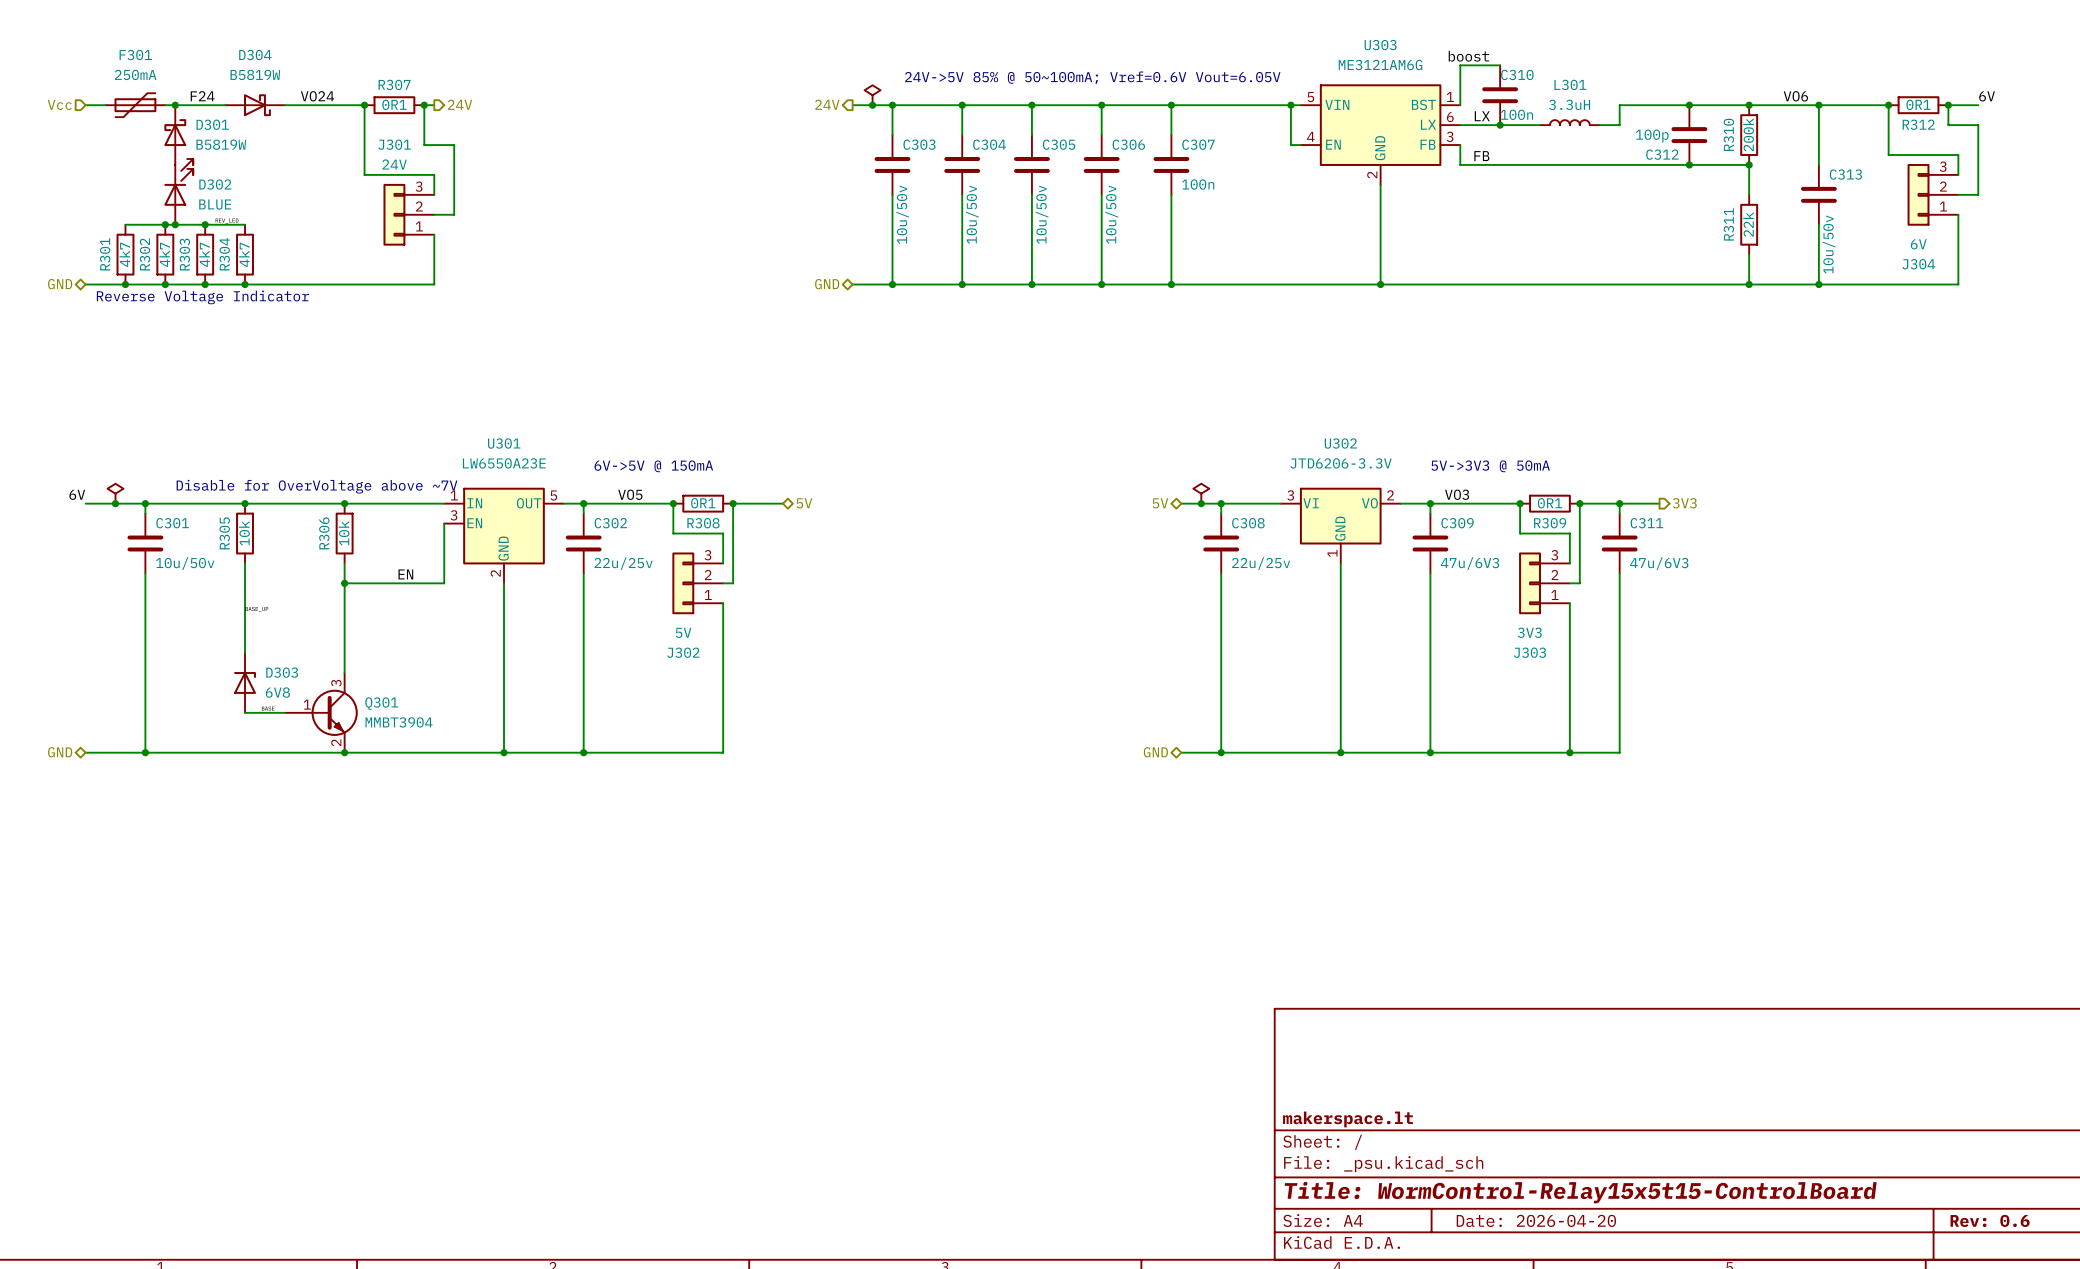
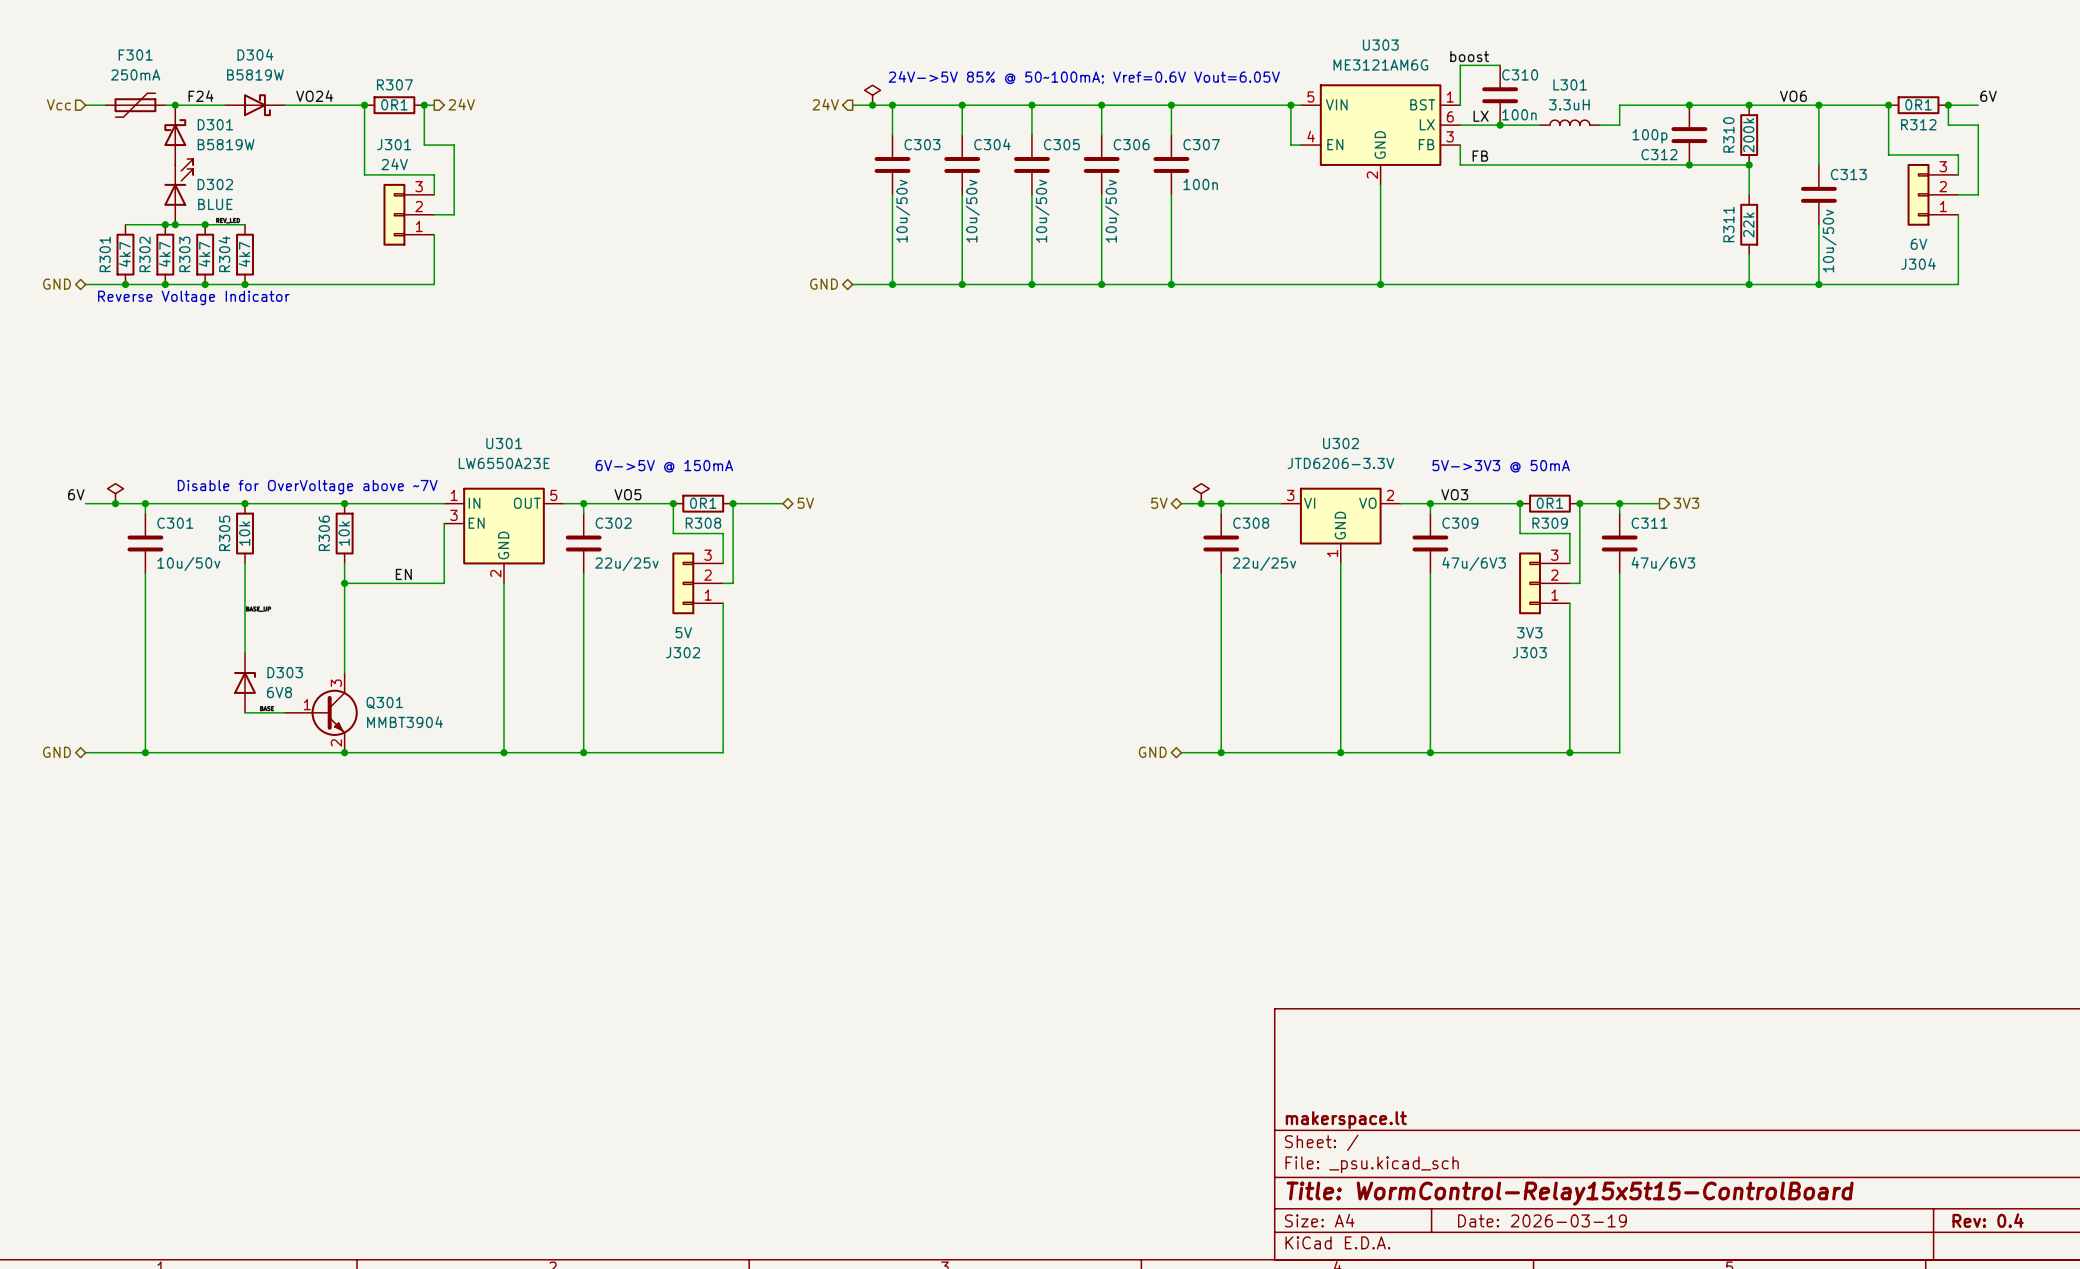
title block: Date: 2026-04-20 (1536, 1220) -> Date: 2026-03-19 (1542, 1220)
title block: Rev: 0.6 (1990, 1220) -> Rev: 0.4 (1988, 1220)

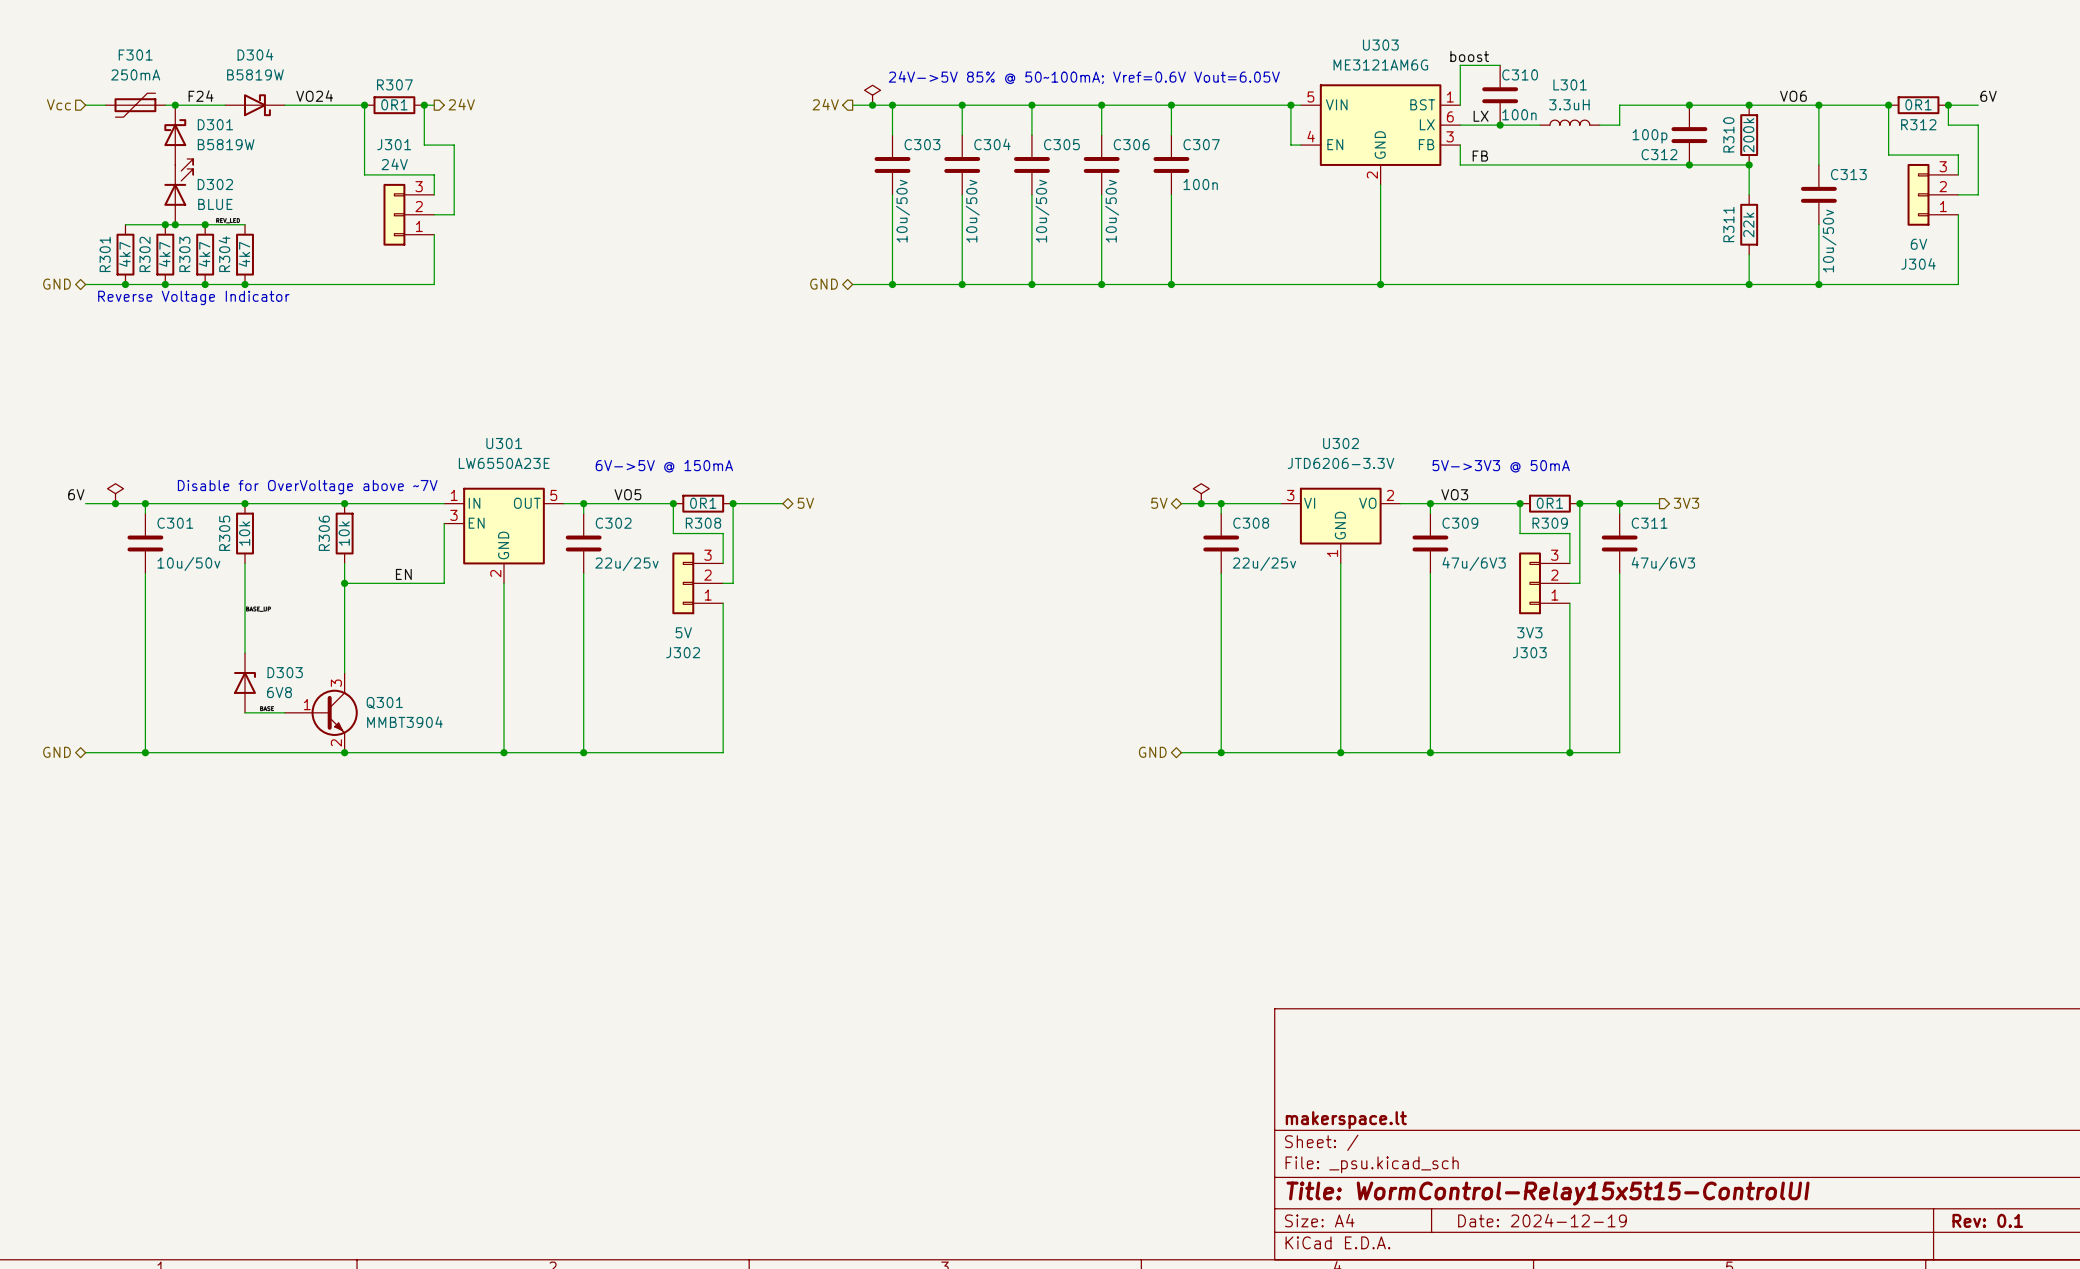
title block: Title: WormControl-Relay15x5t15-ControlBoard (1570, 1193) -> Title: WormControl-Relay15x5t15-ControlUI (1548, 1193)
title block: Date: 2026-03-19 (1542, 1220) -> Date: 2024-12-19 (1542, 1220)
title block: Rev: 0.4 (1988, 1220) -> Rev: 0.1 (1987, 1220)

